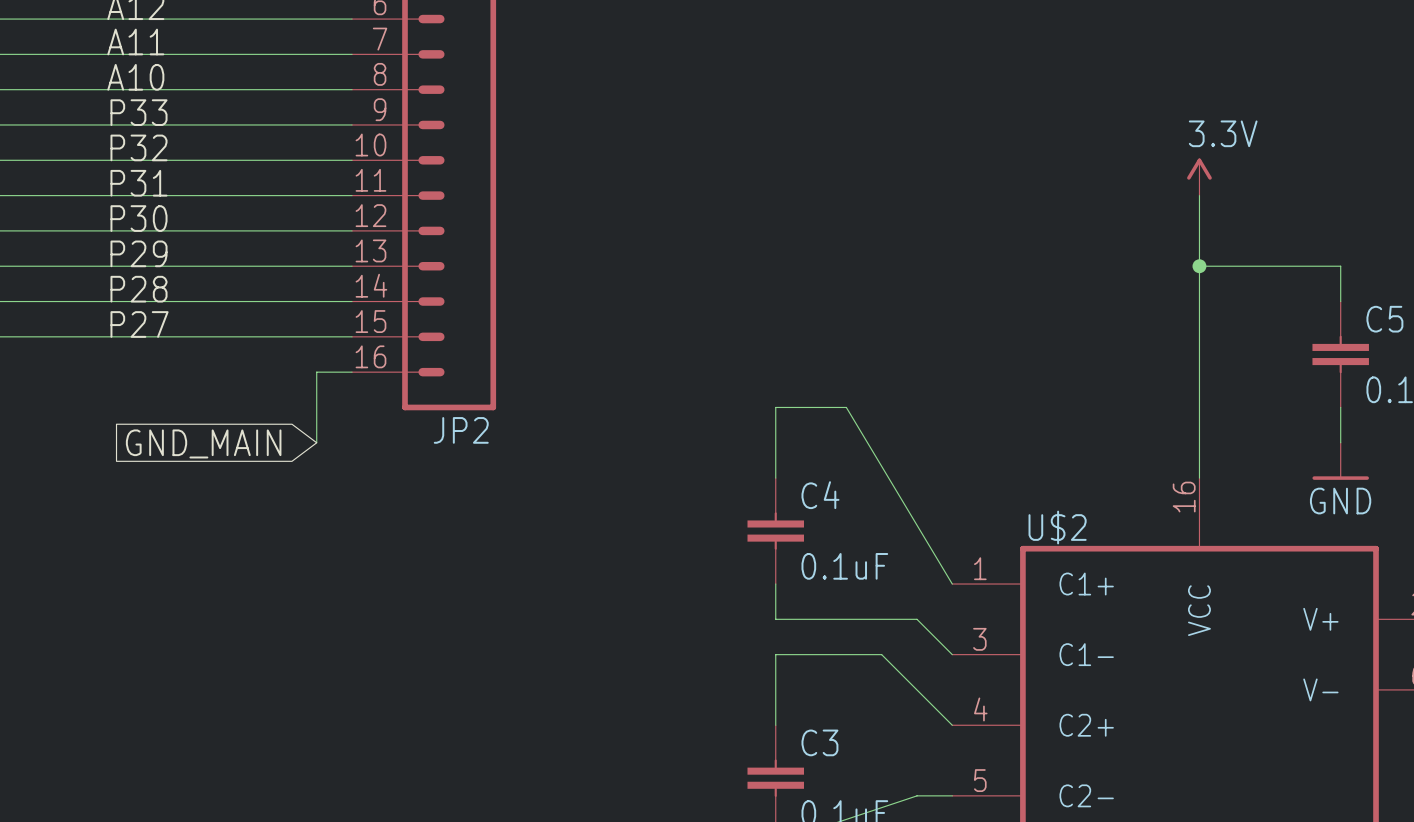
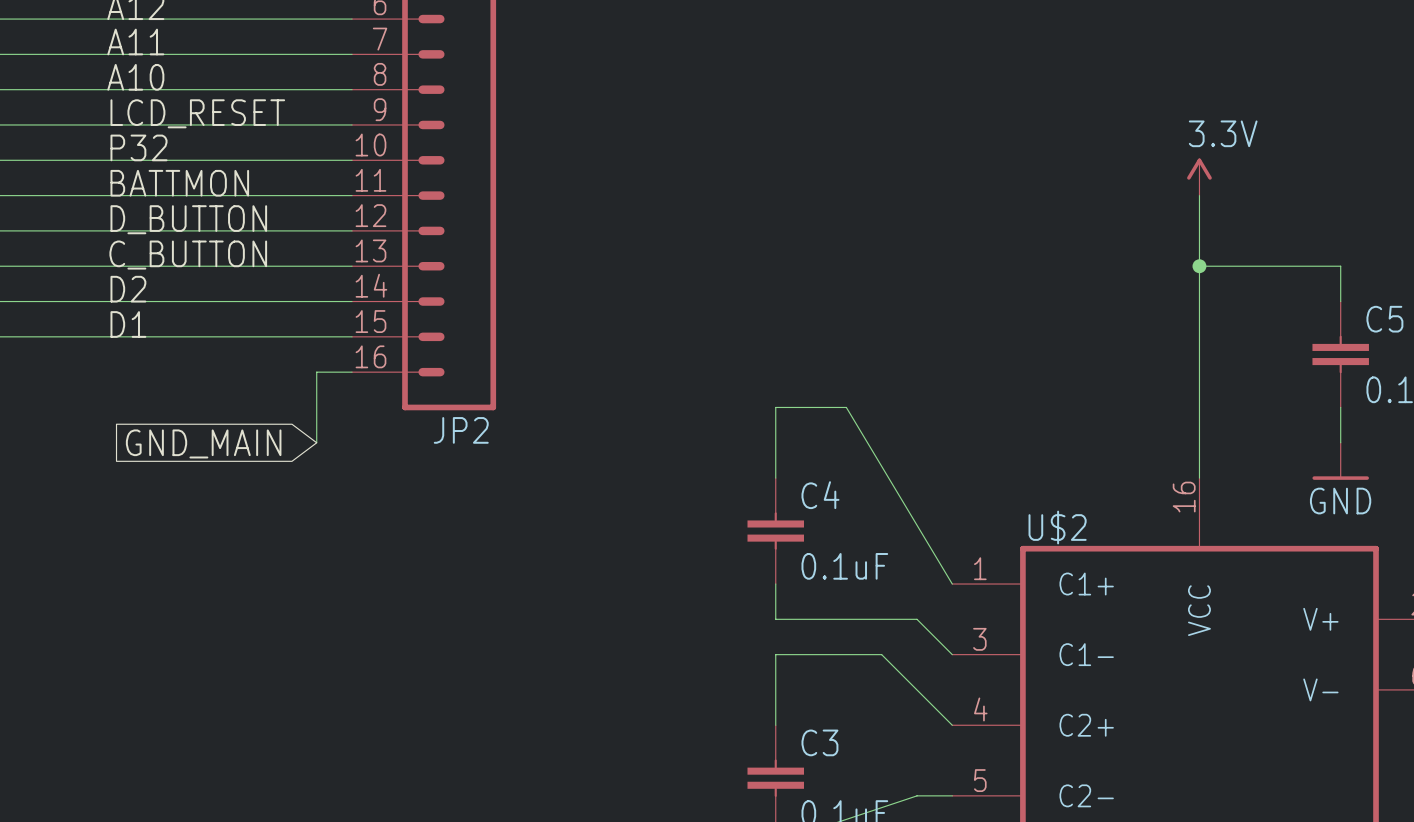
label: P33 (138, 112) -> LCD_RESET (197, 113)
label: P31 (138, 183) -> BATTMON (179, 183)
label: P30 (138, 218) -> D_BUTTON (188, 219)
label: P29 (138, 253) -> C_BUTTON (188, 255)
label: P28 (138, 289) -> D2 (128, 289)
label: P27 (139, 324) -> D1 (128, 324)

